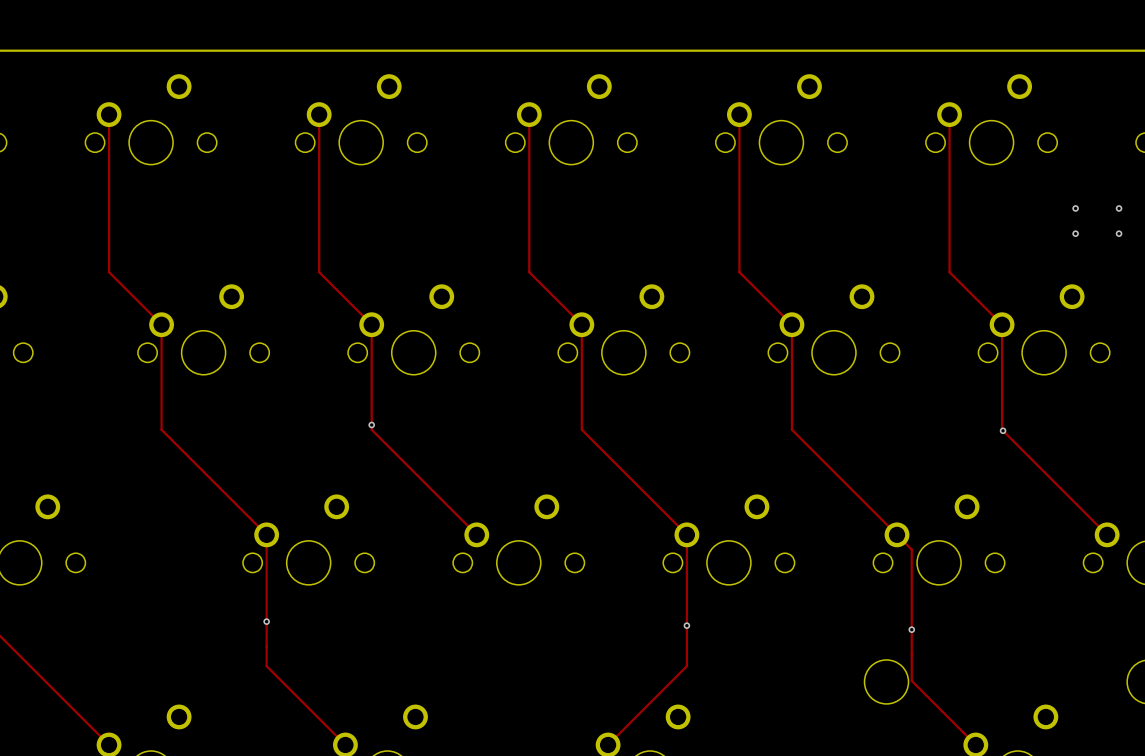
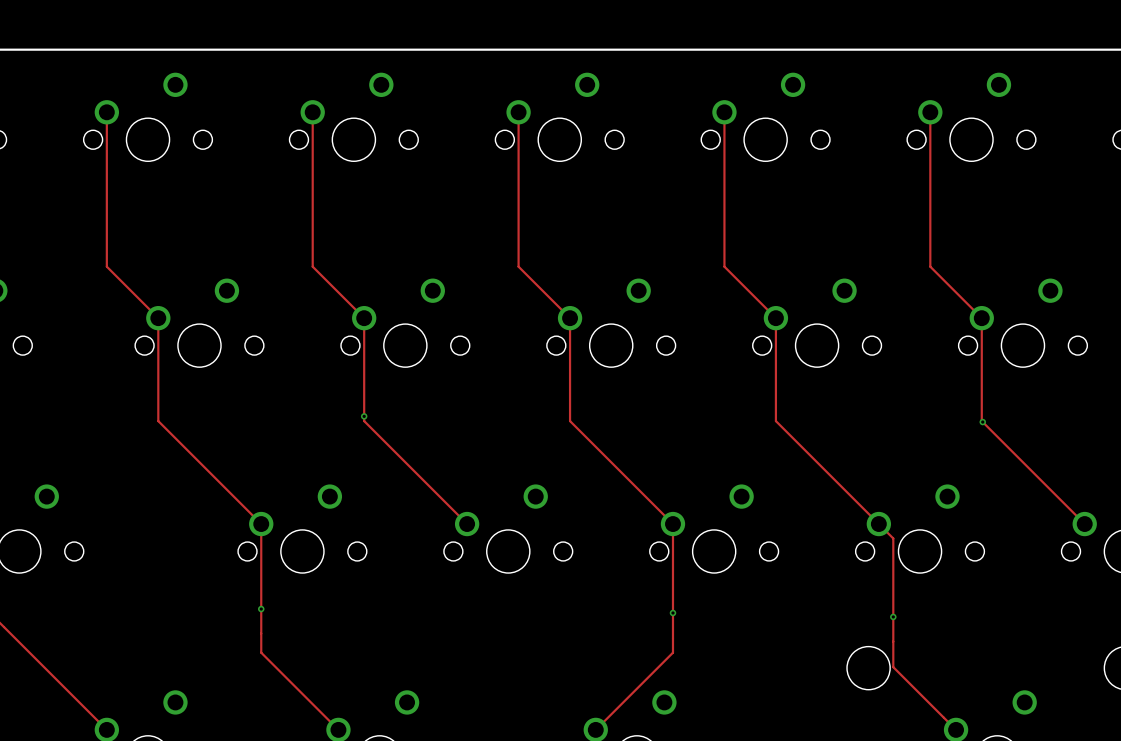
via: (1075, 208) -> none
via: (1119, 208) -> none
via: (1075, 233) -> none
via: (1119, 233) -> none

